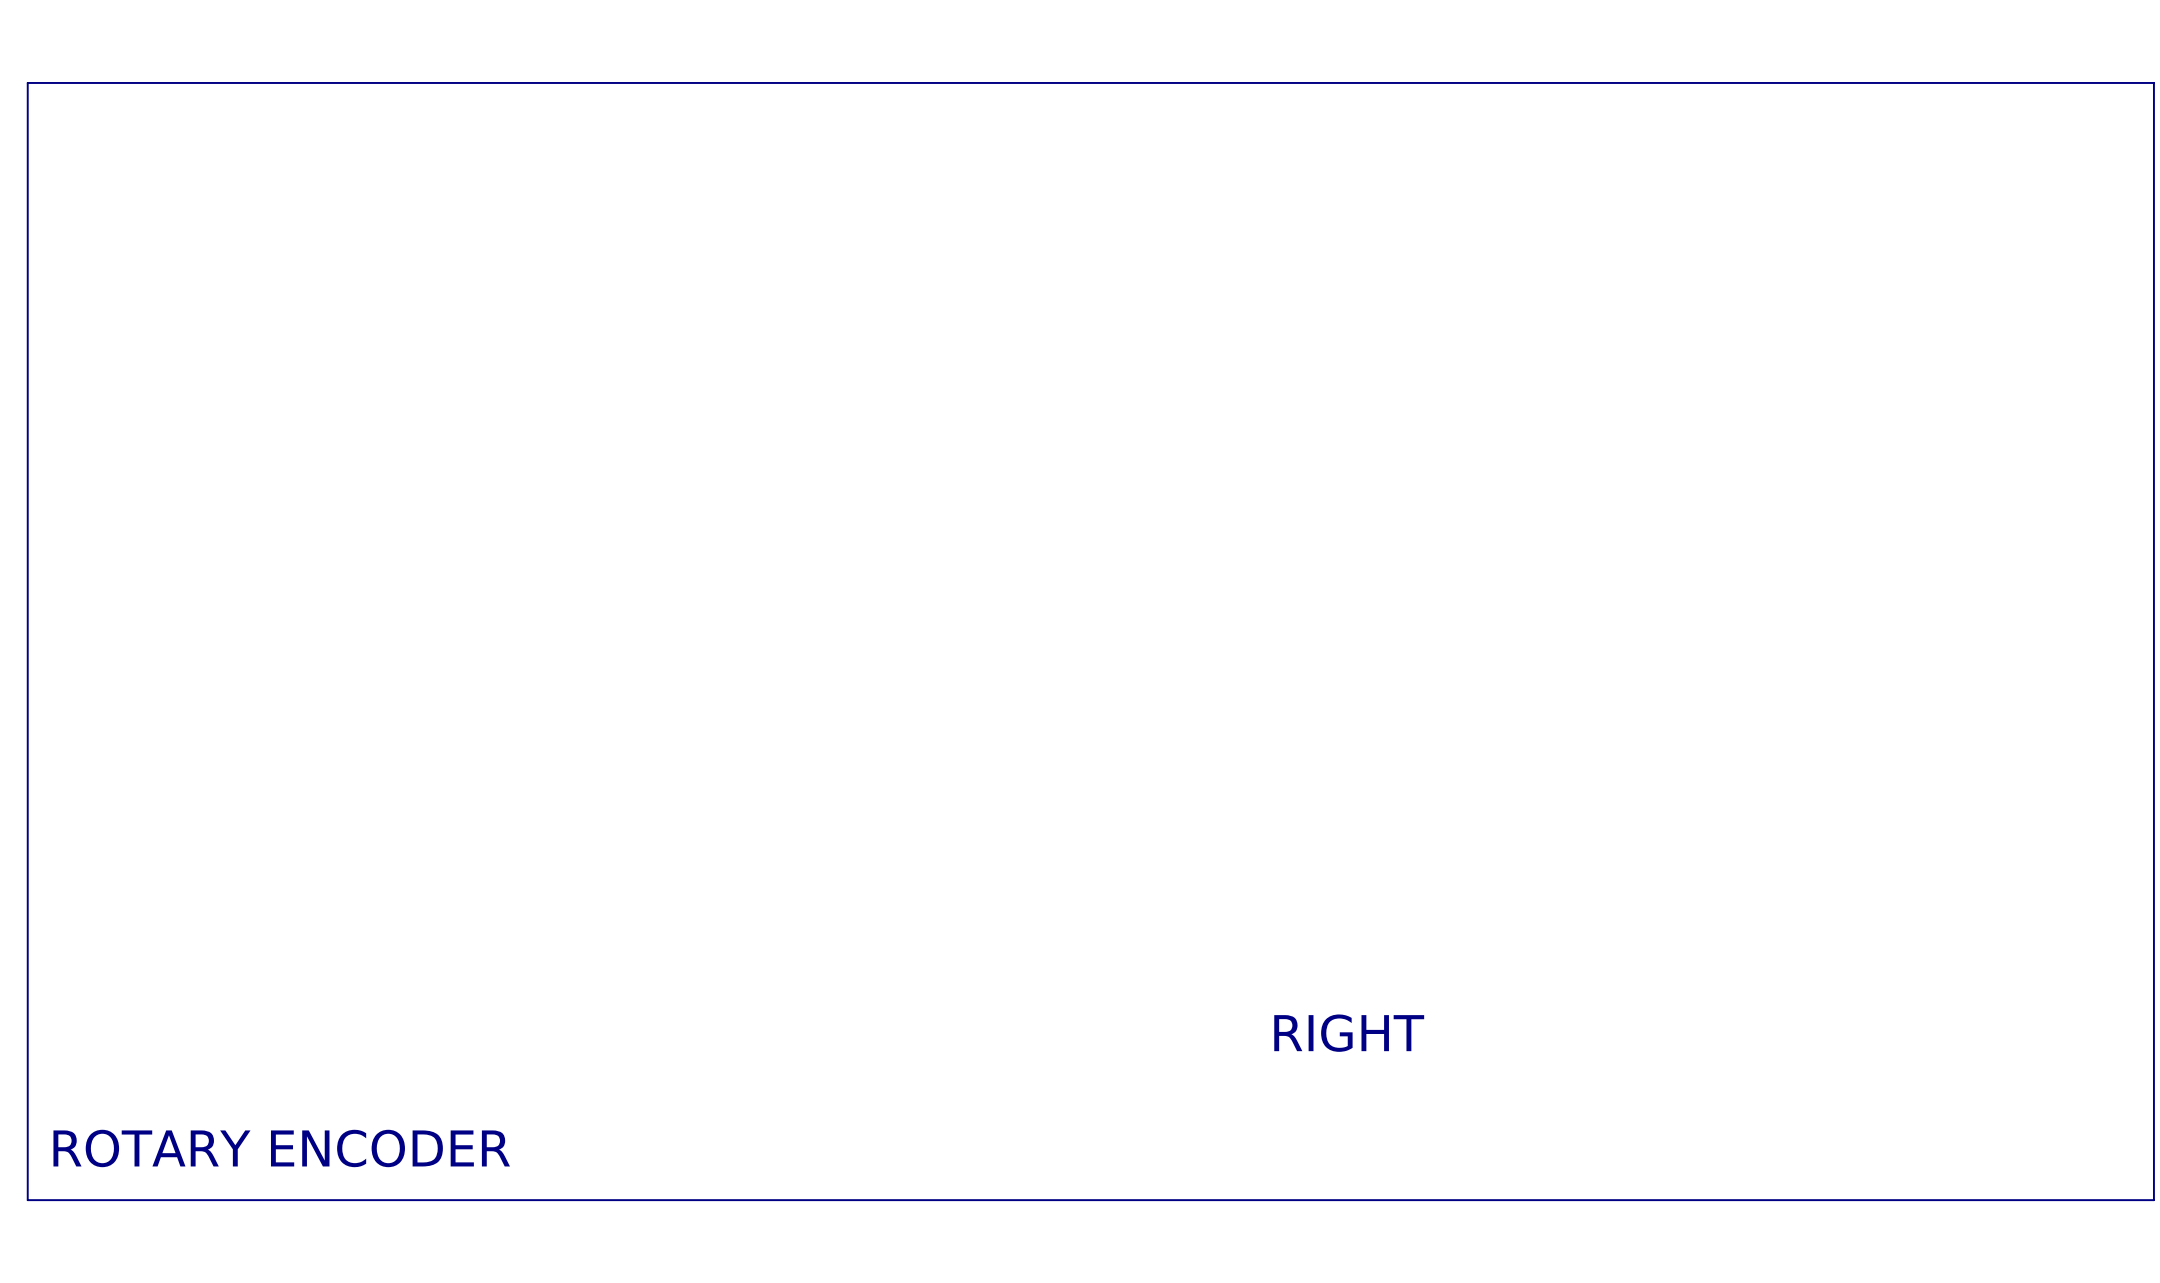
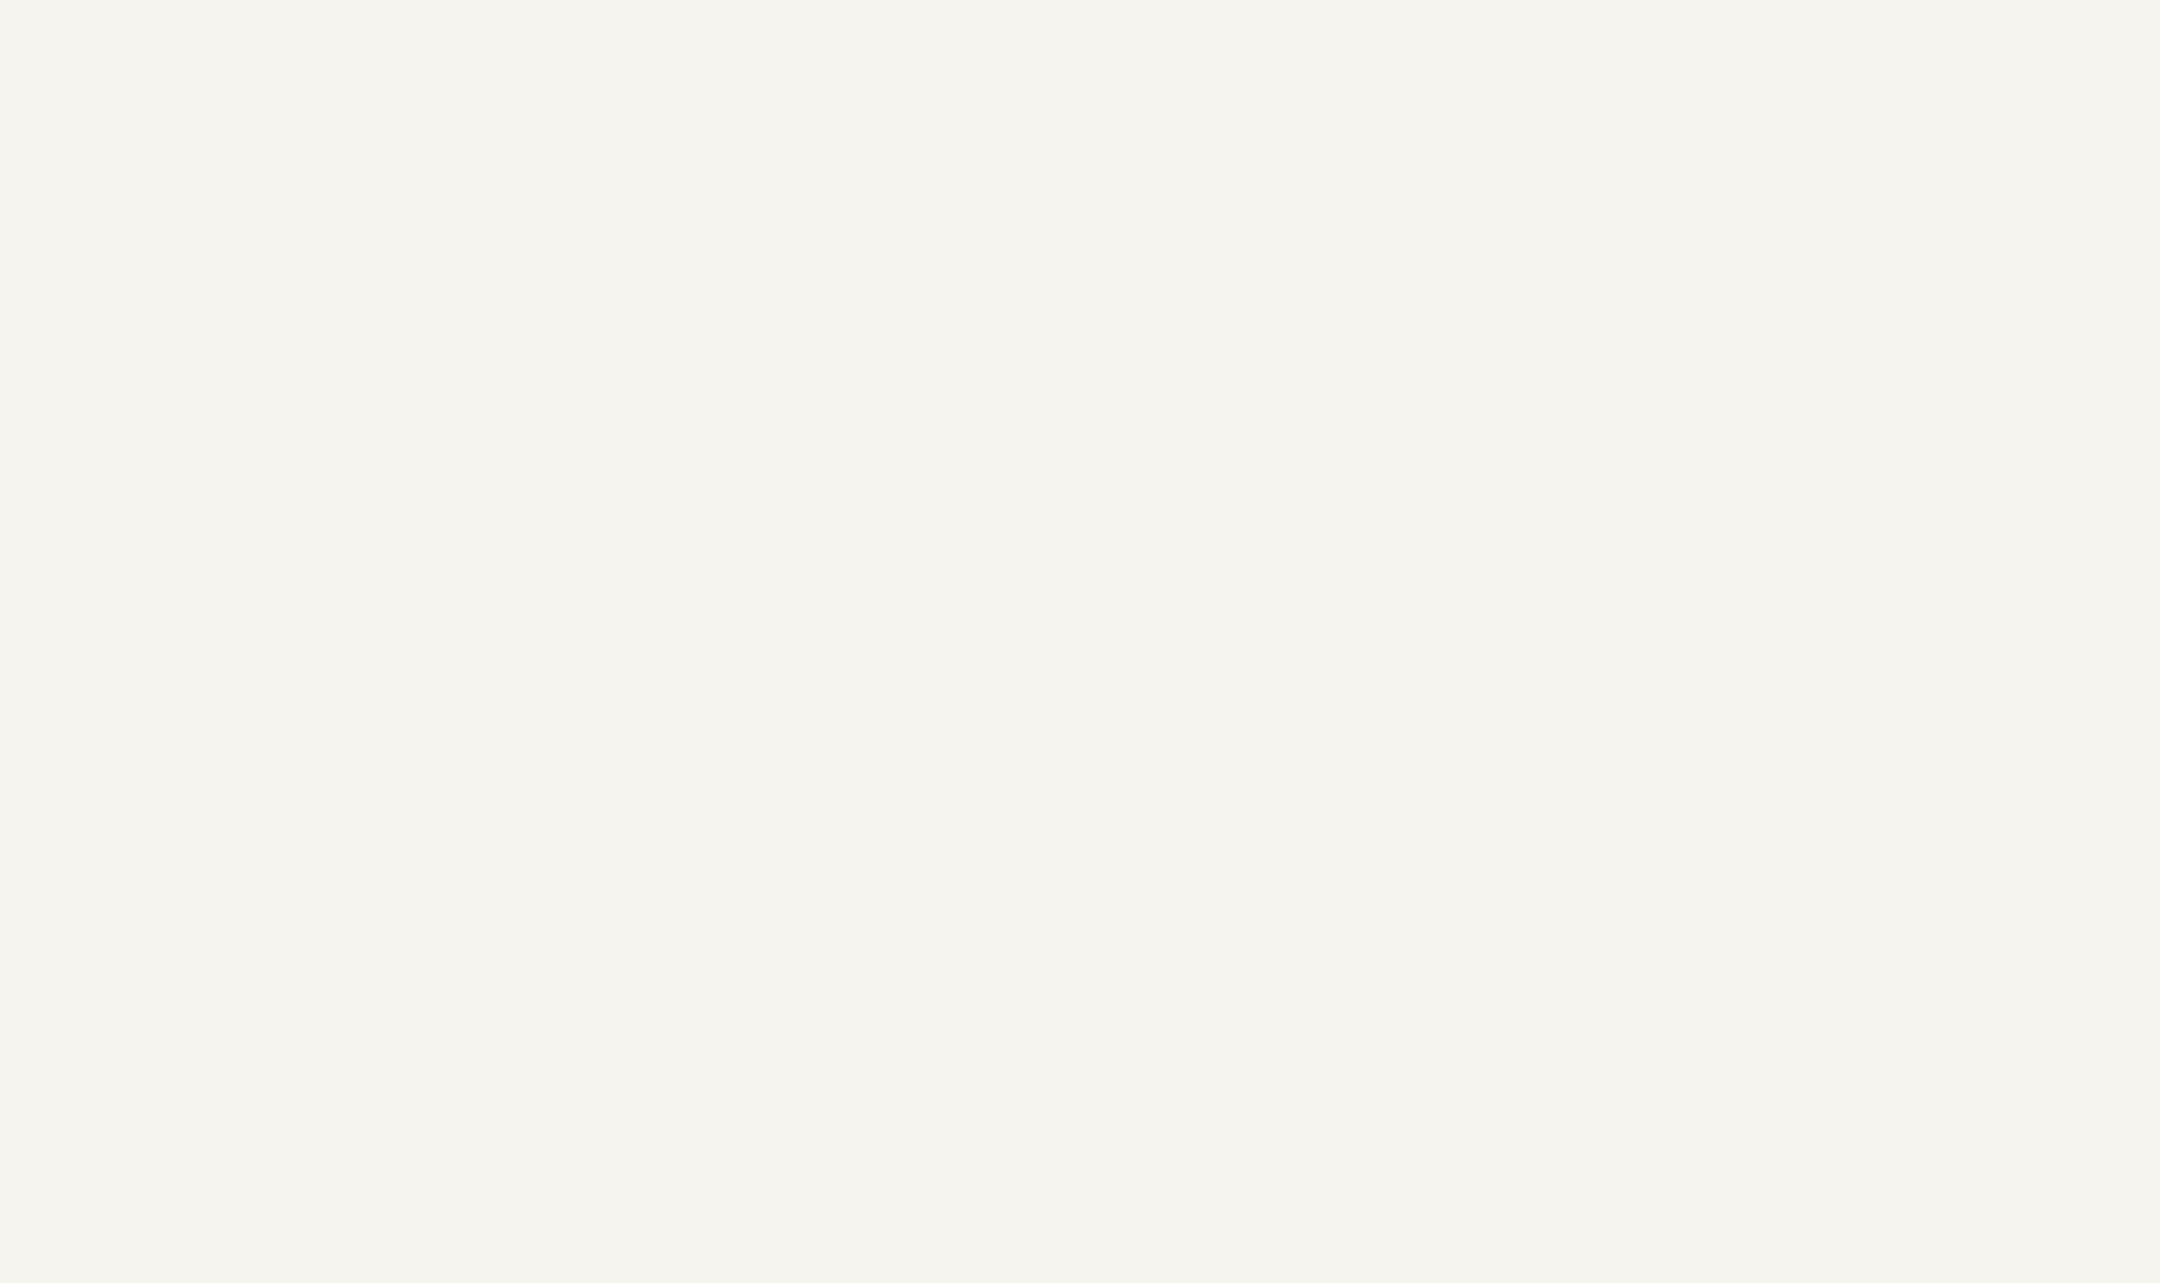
line: (27, 82) (2153, 82) (2153, 1200) (27, 1200) (27, 82) -> none
text: RIGHT (1349, 1033) -> none
text: ROTARY ENCODER (281, 1148) -> none

